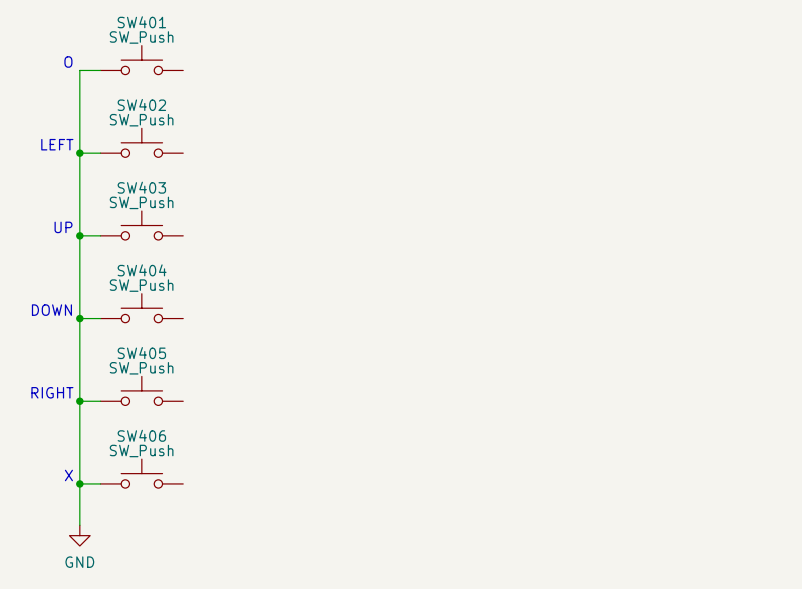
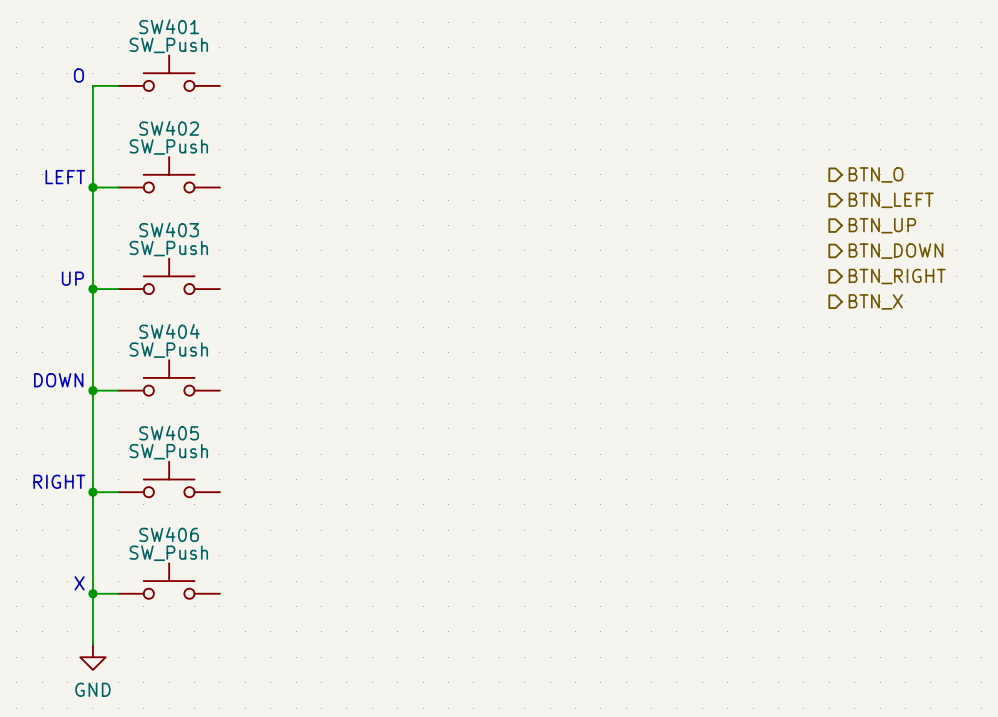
hierarchical label: none -> BTN_O (876, 174)
hierarchical label: none -> BTN_LEFT (891, 200)
hierarchical label: none -> BTN_UP (882, 225)
hierarchical label: none -> BTN_DOWN (896, 251)
hierarchical label: none -> BTN_RIGHT (897, 276)
hierarchical label: none -> BTN_X (875, 301)

